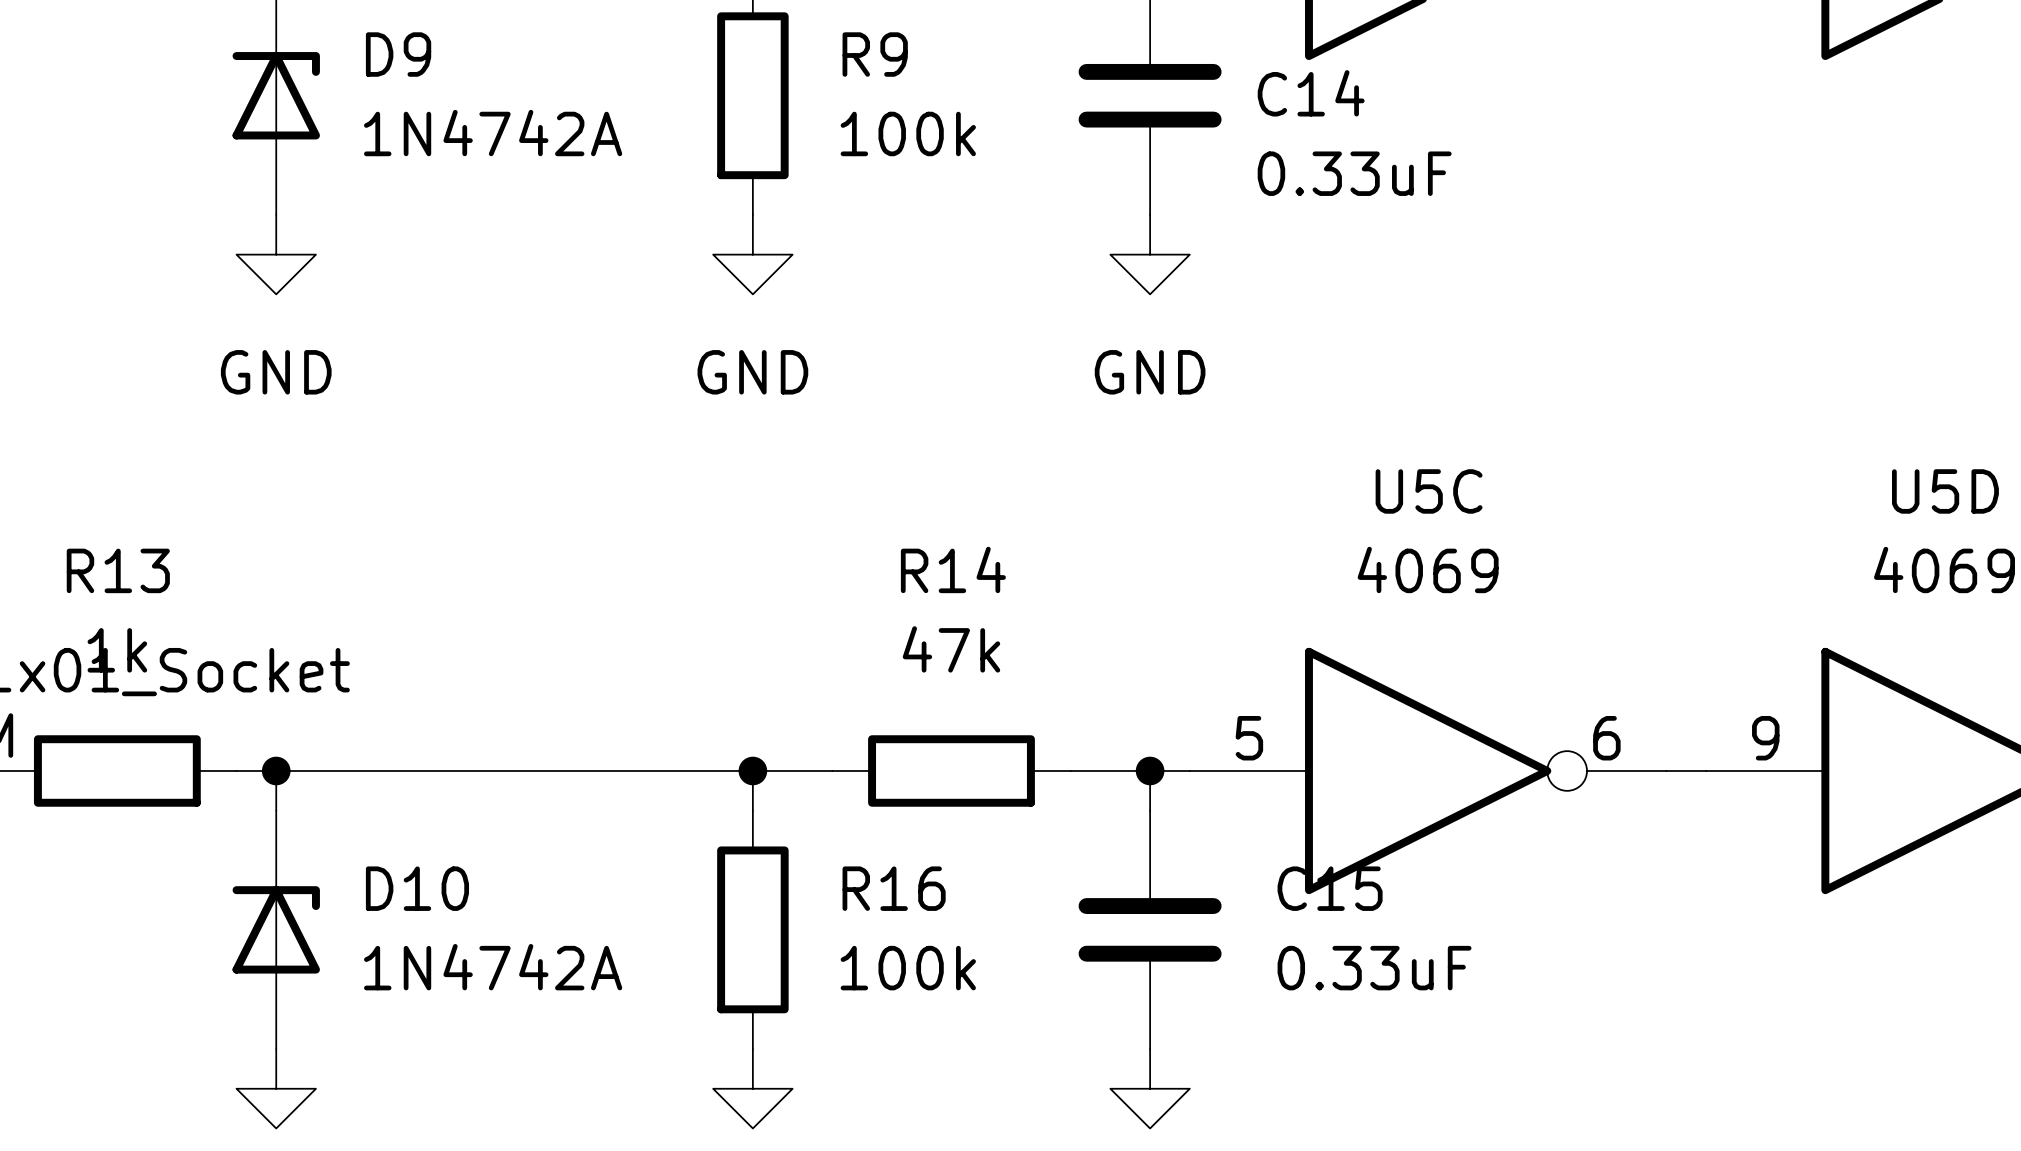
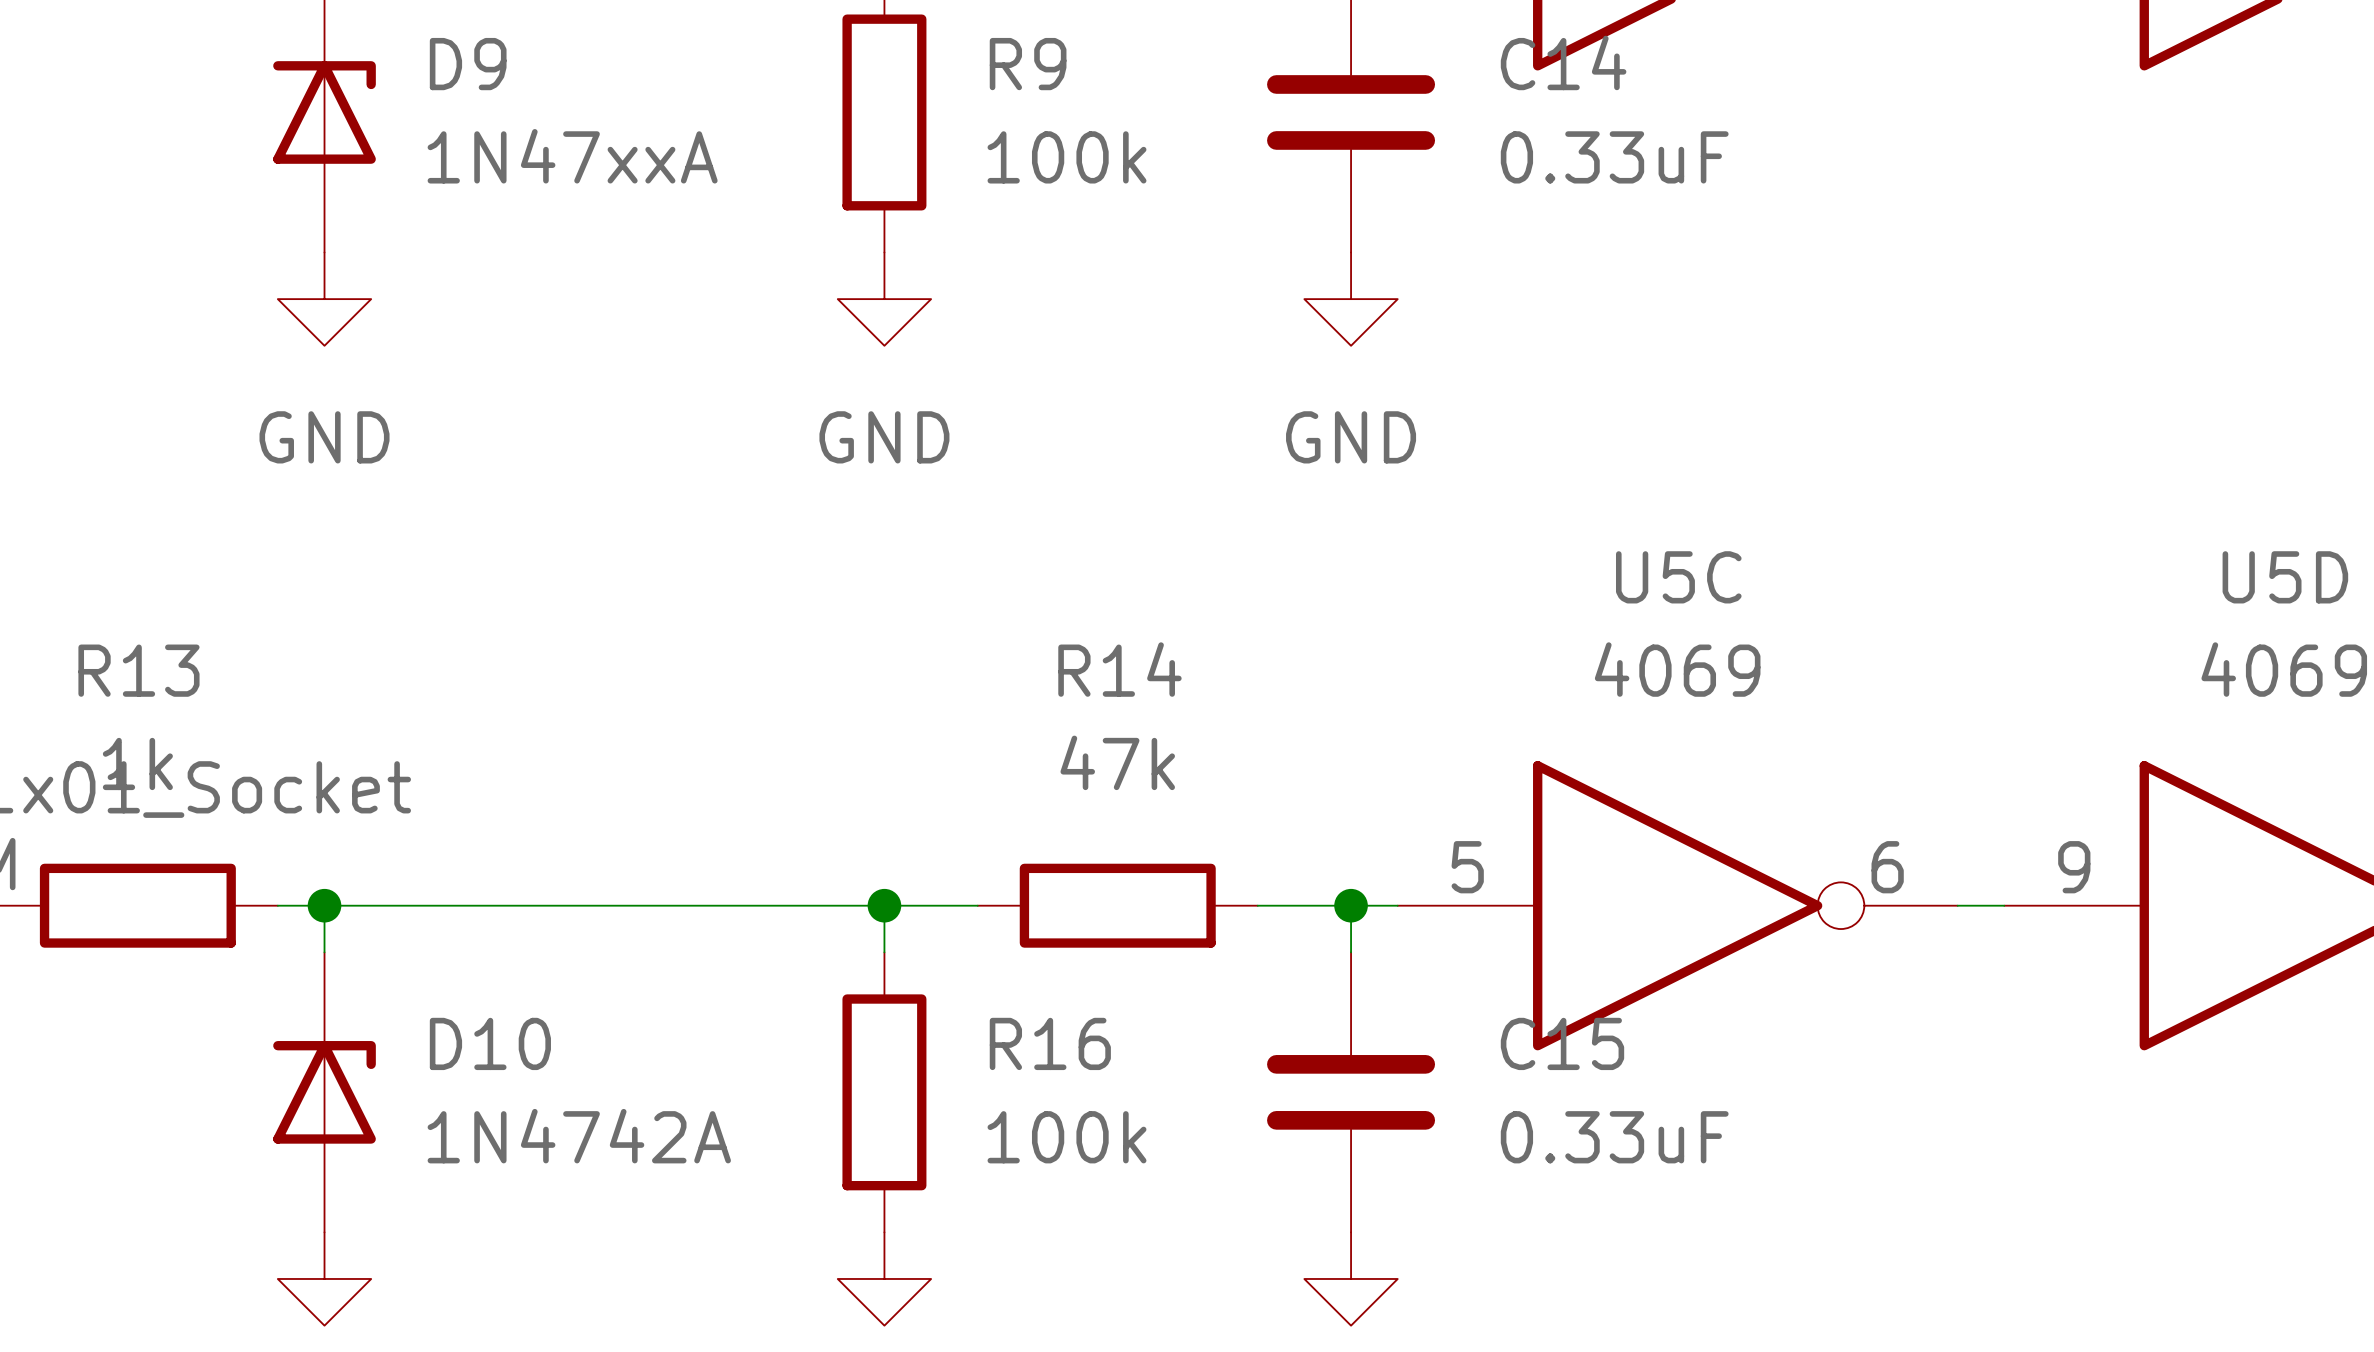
C14 name position: C14 (1311, 93) -> C14 (1563, 62)
D9 value: 1N4742A (493, 133) -> 1N47xxA (572, 156)
C14 value position: 0.33uF (1354, 173) -> 0.33uF (1614, 157)

